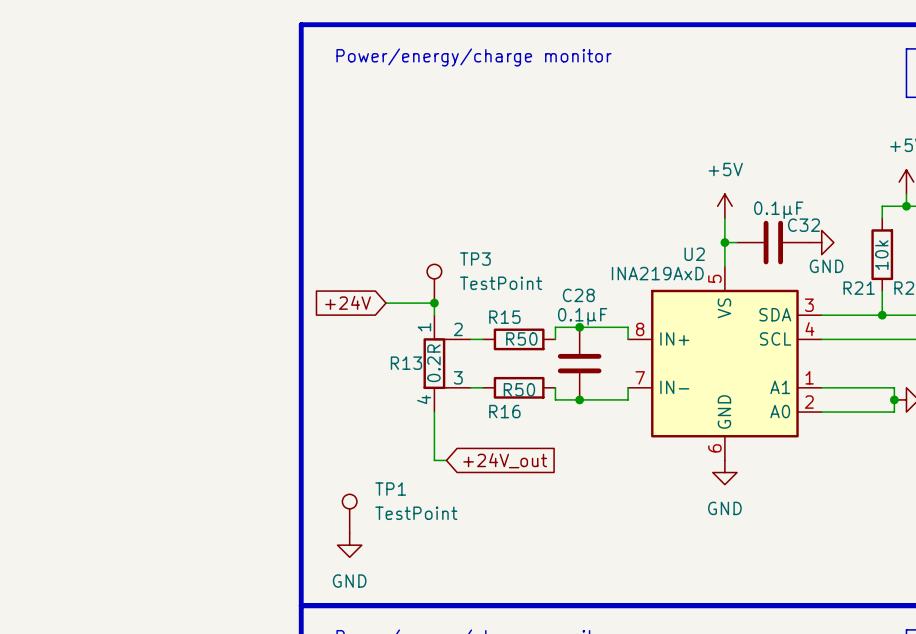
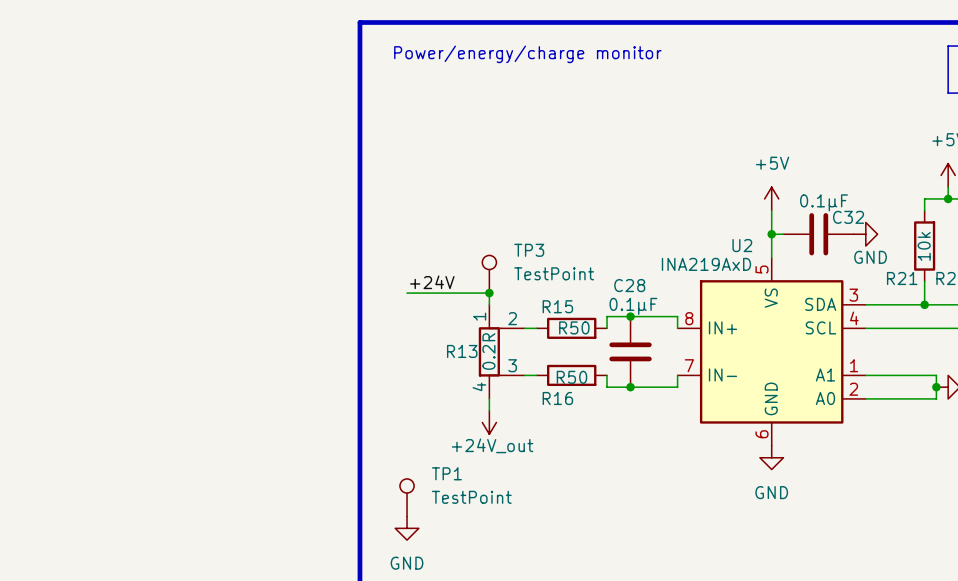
label: none -> +24V (432, 282)
global label: +24V (348, 302) -> none
wire: none -> (407, 293) (442, 293)
power symbol: none -> +24V_out (489, 422)
global label: +24V_out (505, 460) -> none

